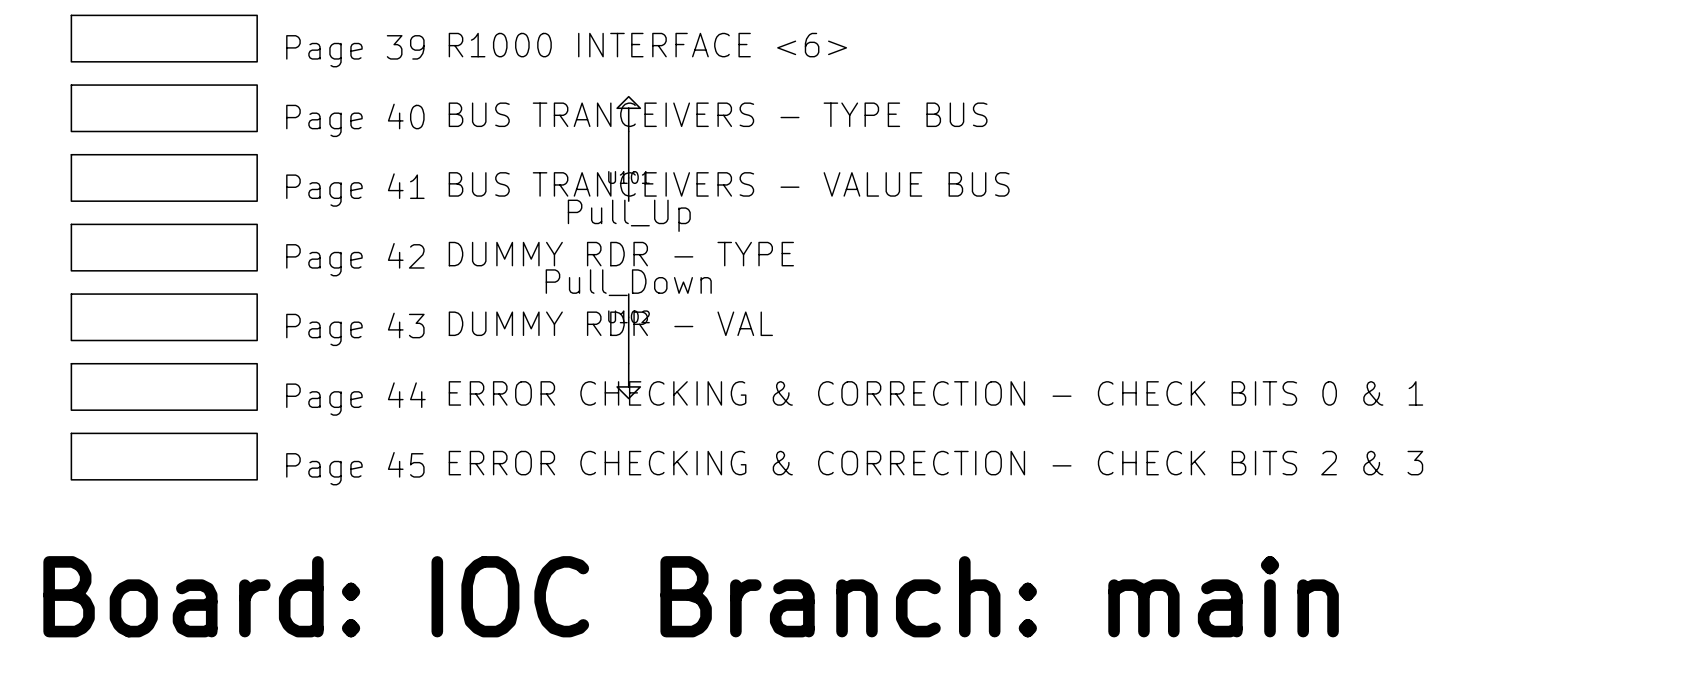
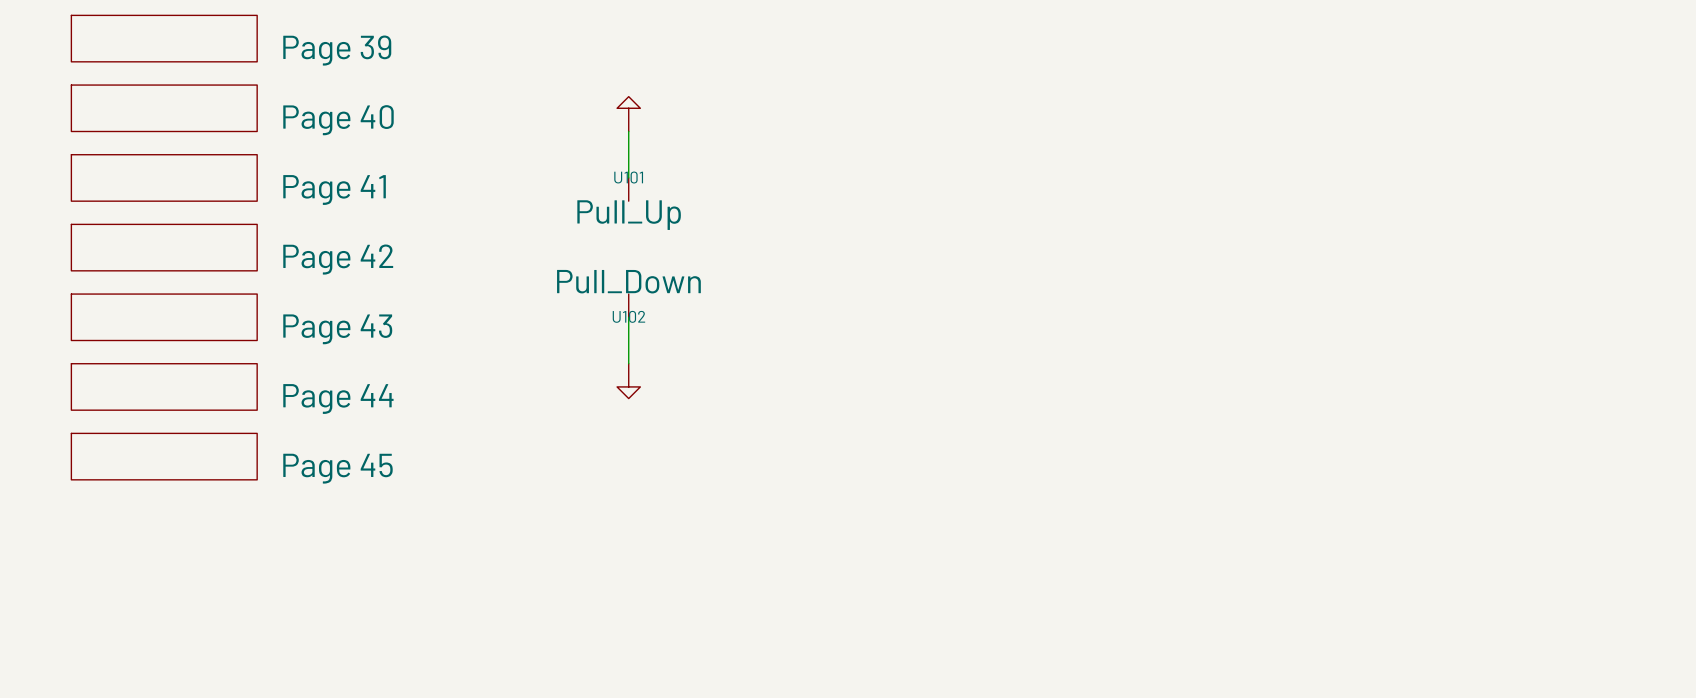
text: R1000 INTERFACE <6> (647, 45) -> none
text: BUS TRANCEIVERS - TYPE BUS (718, 114) -> none
text: BUS TRANCEIVERS - VALUE BUS (729, 184) -> none
text: DUMMY RDR - TYPE (621, 254) -> none
text: DUMMY RDR - VAL (610, 323) -> none
text: ERROR CHECKING & CORRECTION - CHECK BITS 0 & 1 (935, 393) -> none
text: ERROR CHECKING & CORRECTION - CHECK BITS 2 & 3 (935, 463) -> none
text: Board: IOC Branch: main (691, 596) -> none

